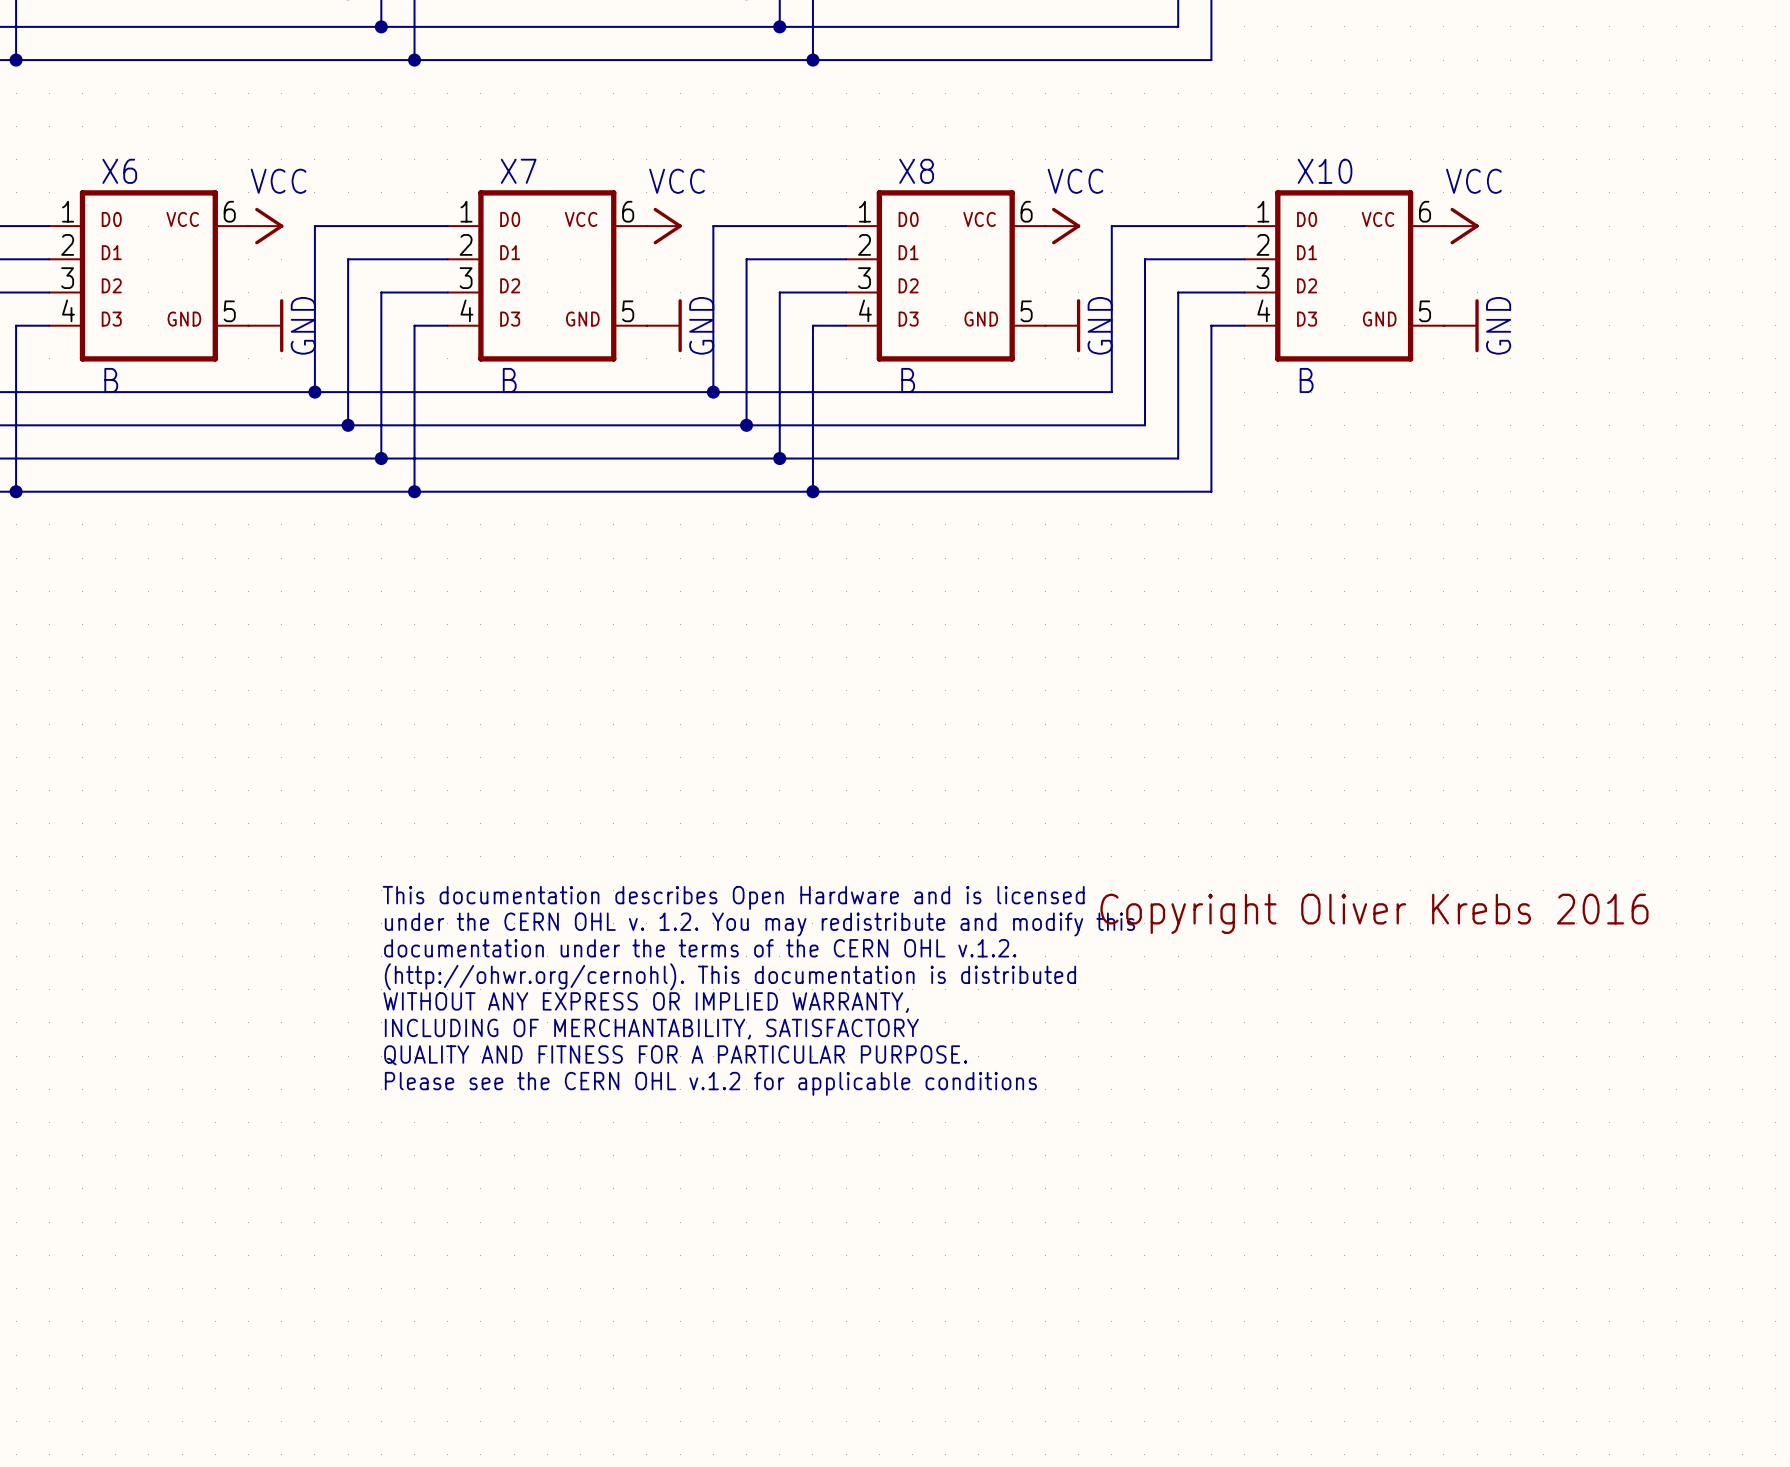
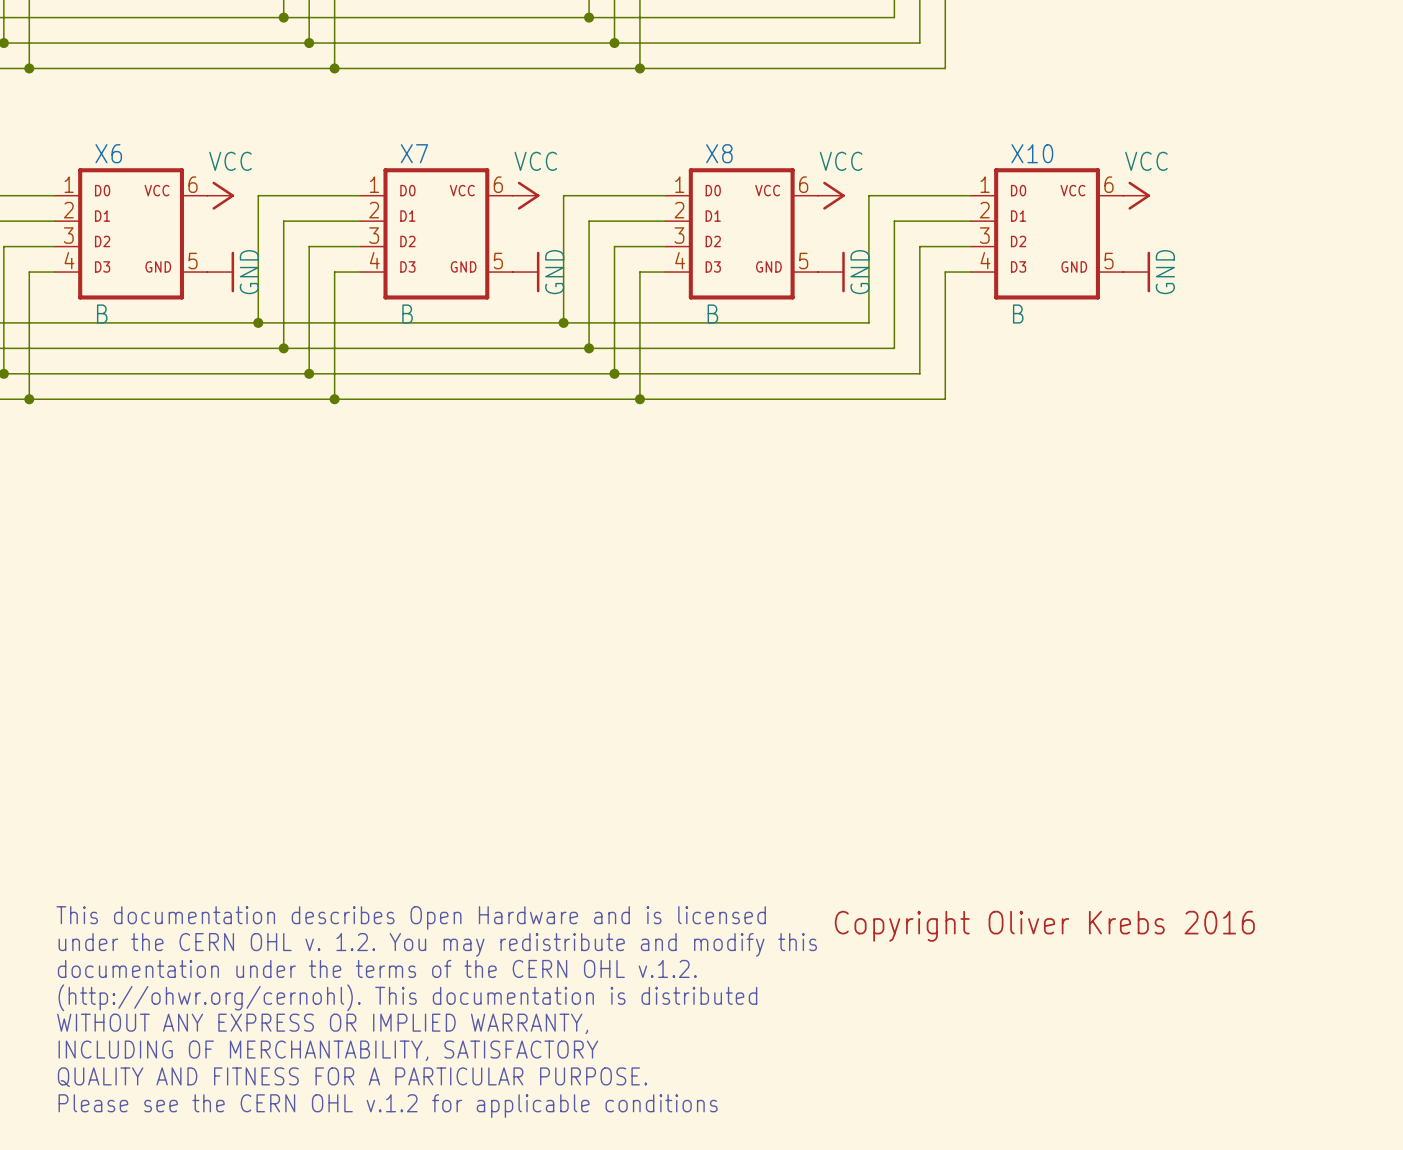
text: This documentation describes Open Hardware and is licensed (733, 897) -> none
text position: Copyright Oliver Krebs 2016 (1374, 913) -> Copyright Oliver Krebs 2016 (1044, 926)
text: under the CERN OHL v. 1.2. You may redistribute and modify this (759, 924) -> none
text: documentation under the terms of the CERN OHL v.1.2. (700, 948) -> none
text: (http://ohwr.org/cernohl). This documentation is distributed (730, 976) -> none
text: WITHOUT ANY EXPRESS OR IMPLIED WARRANTY, (646, 1002) -> none
text: INCLUDING OF MERCHANTABILITY, SATISFACTORY (651, 1029) -> none
text: QUALITY AND FITNESS FOR A PARTICULAR PURPOSE. (675, 1055) -> none
text: Please see the CERN OHL v.1.2 for applicable conditions (710, 1083) -> none
text: none -> This documentation describes Open Hardware and is licensed (411, 917)
text: none -> under the CERN OHL v. 1.2. You may redistribute and modify this (437, 944)
text: none -> documentation under the terms of the CERN OHL v.1.2. (377, 968)
text: none -> (http://ohwr.org/cernohl). This documentation is distributed (407, 997)
text: none -> WITHOUT ANY EXPRESS OR IMPLIED WARRANTY, (322, 1023)
text: none -> INCLUDING OF MERCHANTABILITY, SATISFACTORY (328, 1050)
text: none -> QUALITY AND FITNESS FOR A PARTICULAR PURPOSE. (352, 1077)
text: none -> Please see the CERN OHL v.1.2 for applicable conditions (388, 1106)

